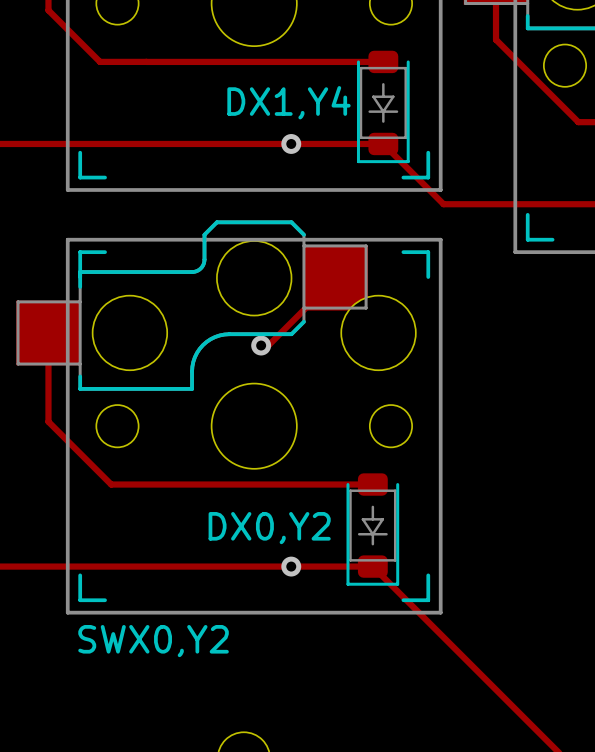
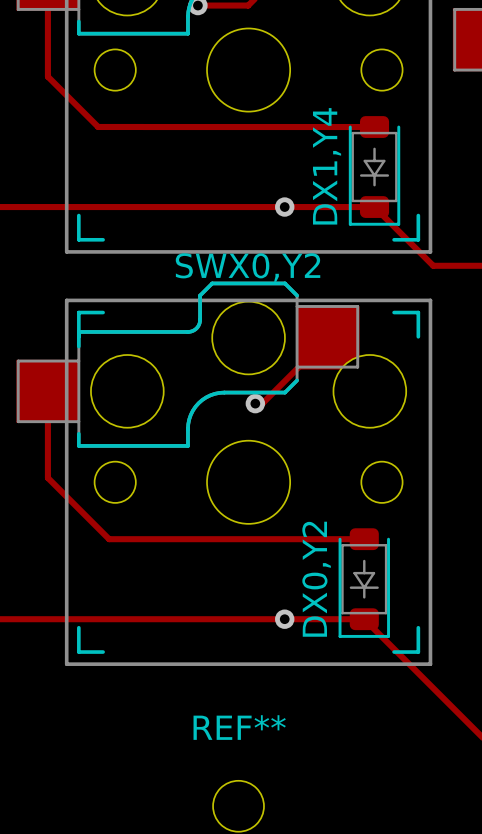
DX1,Y4 name rotation: 0° (289, 102) -> 90° counterclockwise (327, 166)
DX0,Y2 name rotation: 0° (269, 528) -> 90° counterclockwise (316, 579)
SWX0,Y2 name position: SWX0,Y2 (153, 641) -> SWX0,Y2 (248, 267)
REF** name: none -> REF** (239, 727)

